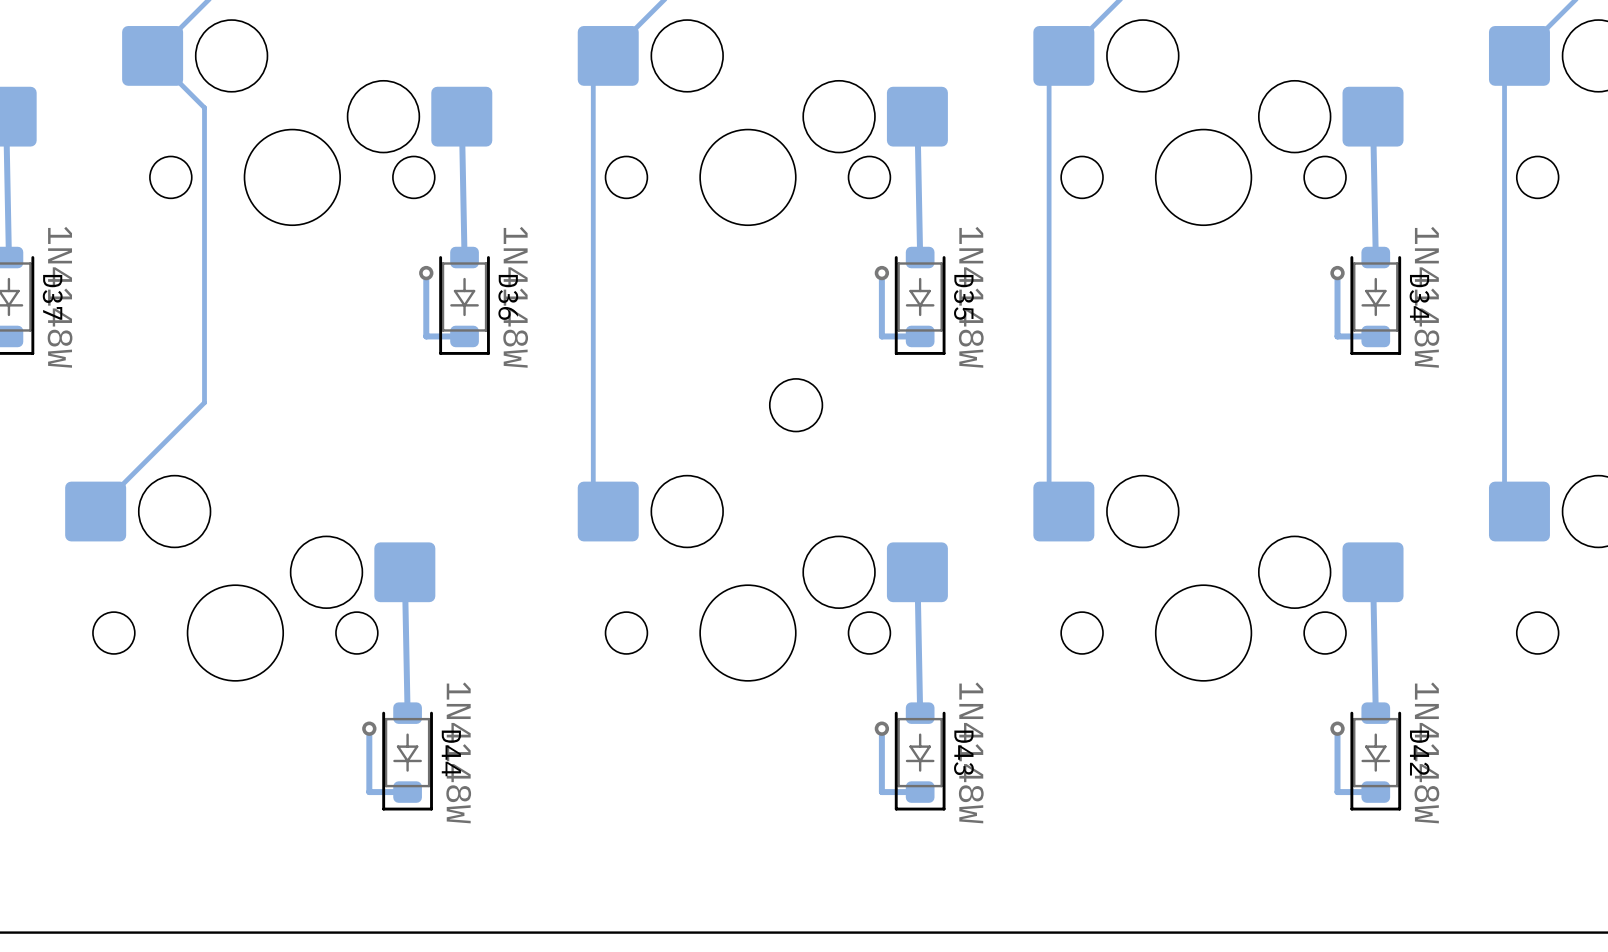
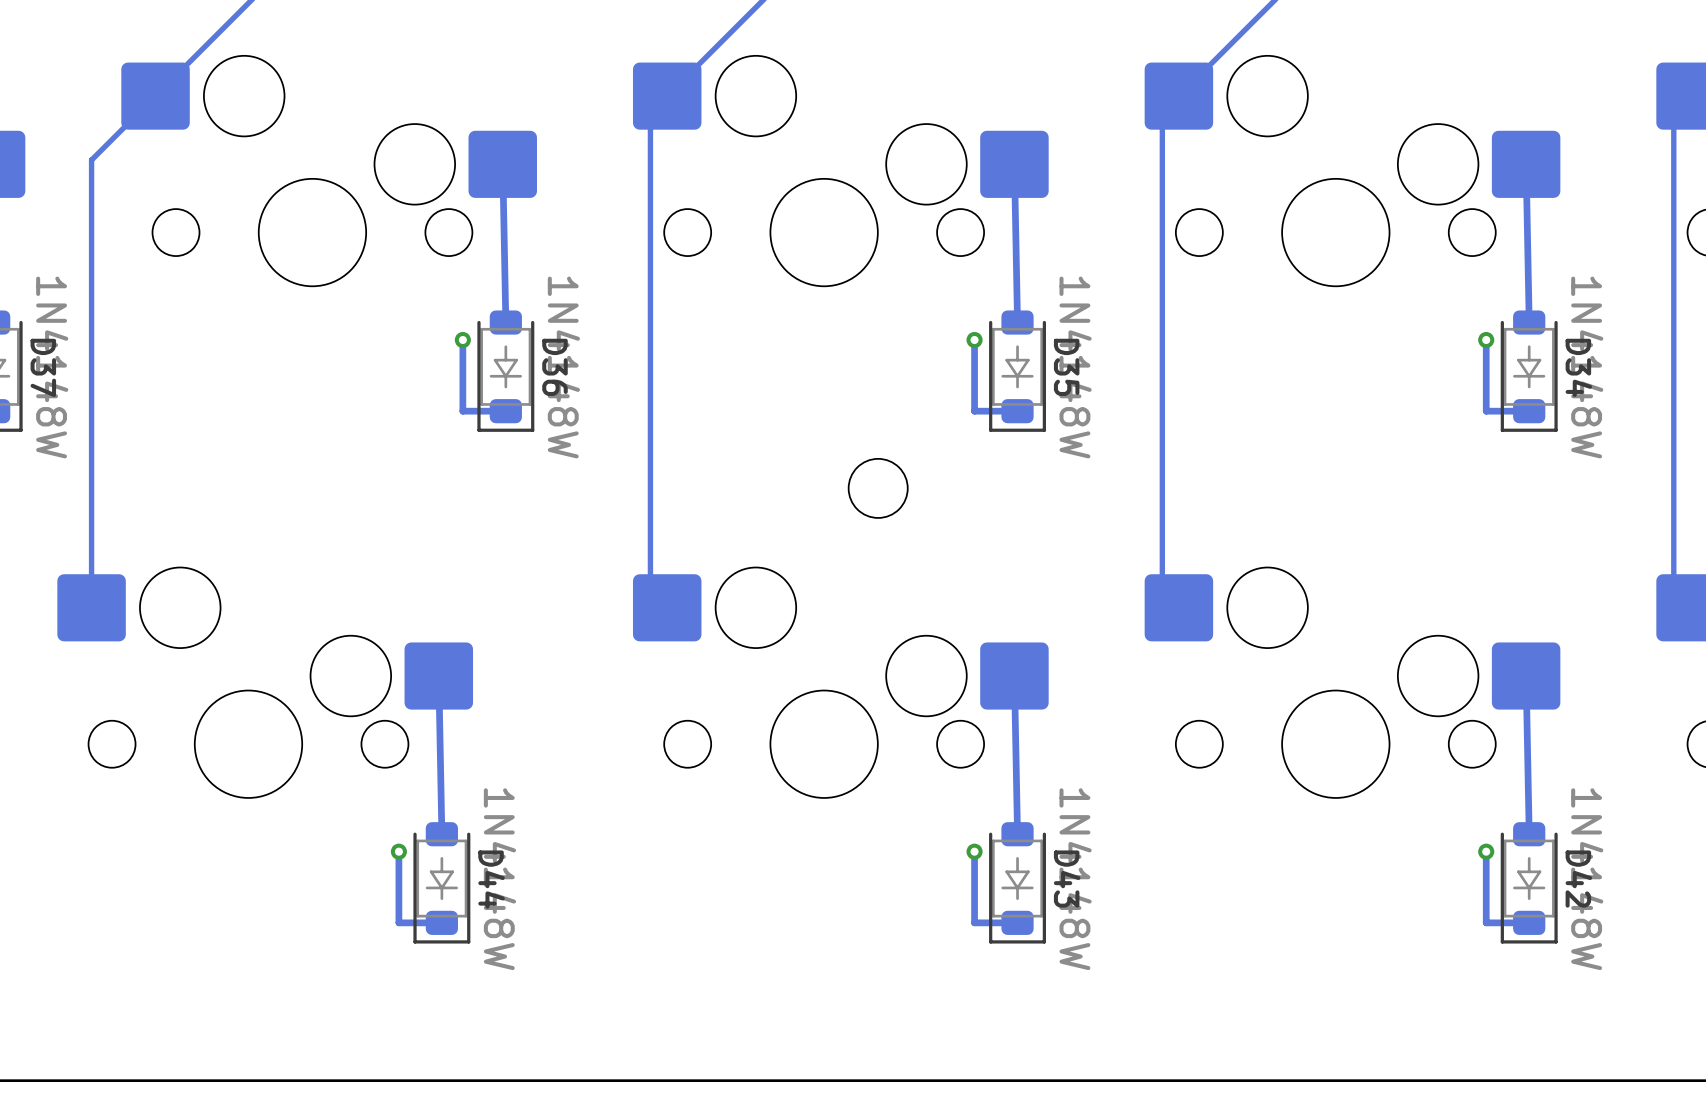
track: (152, 55) (204, 107) (204, 402) (95, 511) -> (155, 96) (91, 160) (91, 607)

